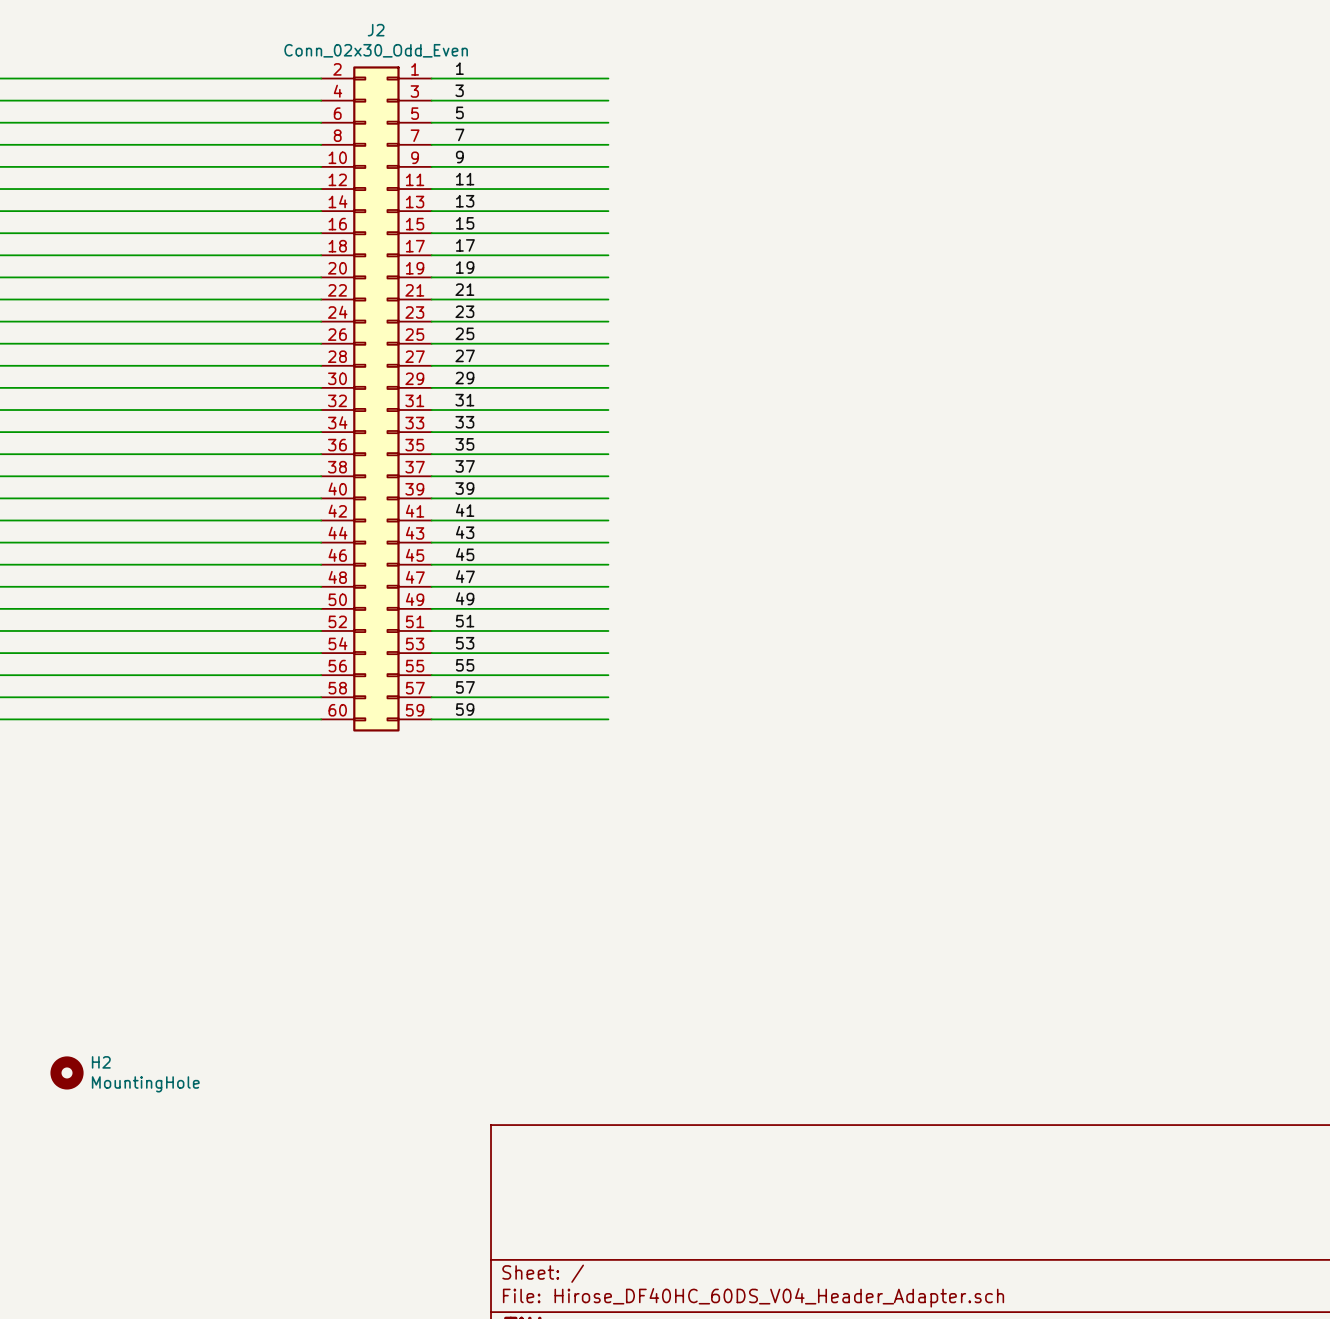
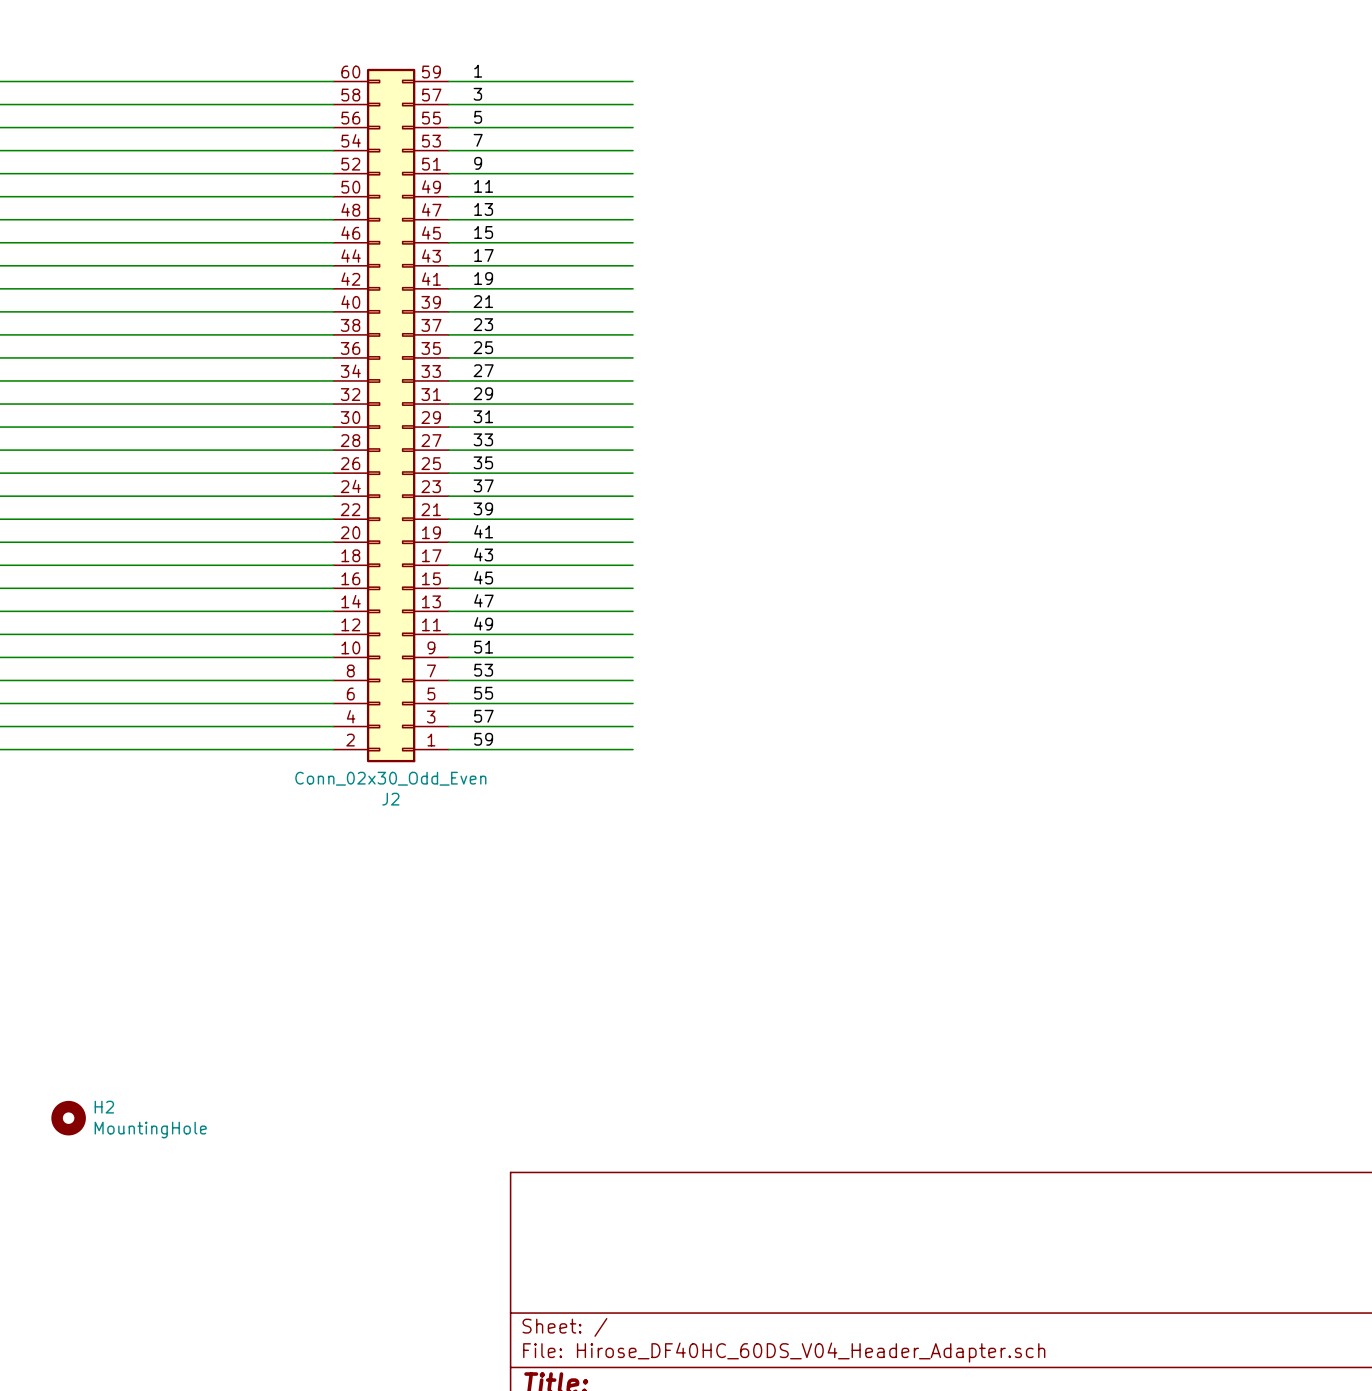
J2 flip: as is (376, 398) -> up-down (391, 415)

